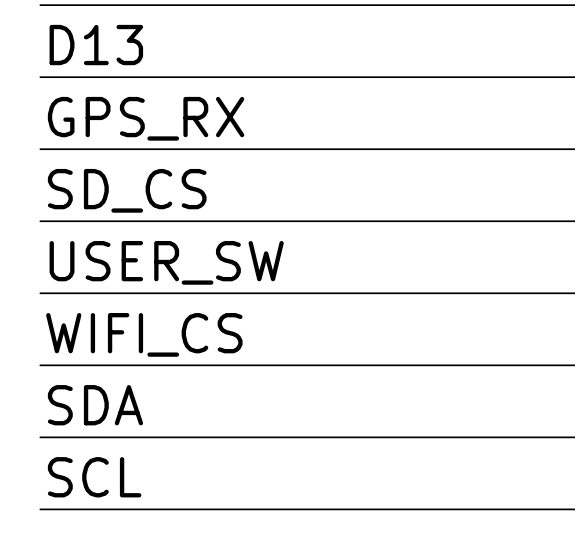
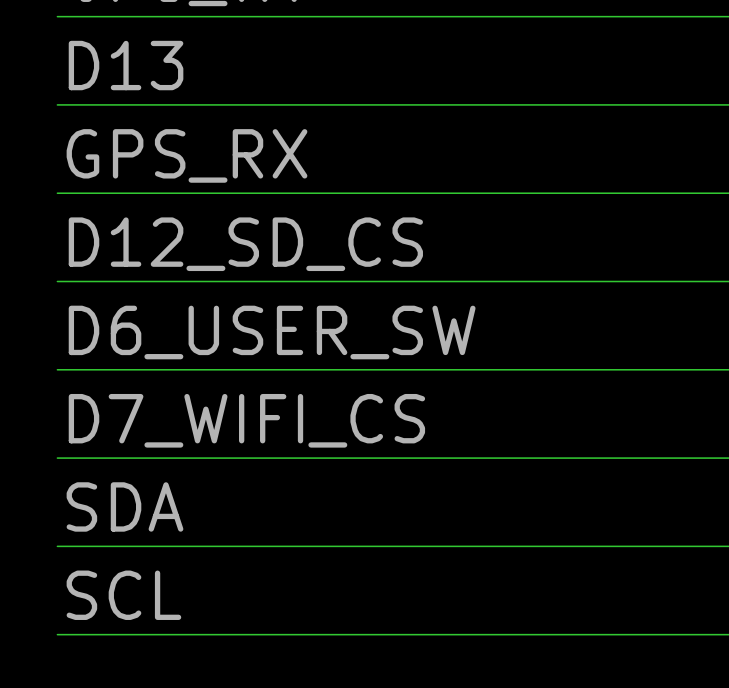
label: SD_CS (127, 190) -> D12_SD_CS (245, 244)
label: USER_SW (166, 262) -> D6_USER_SW (272, 332)
label: WIFI_CS (144, 334) -> D7_WIFI_CS (246, 420)

